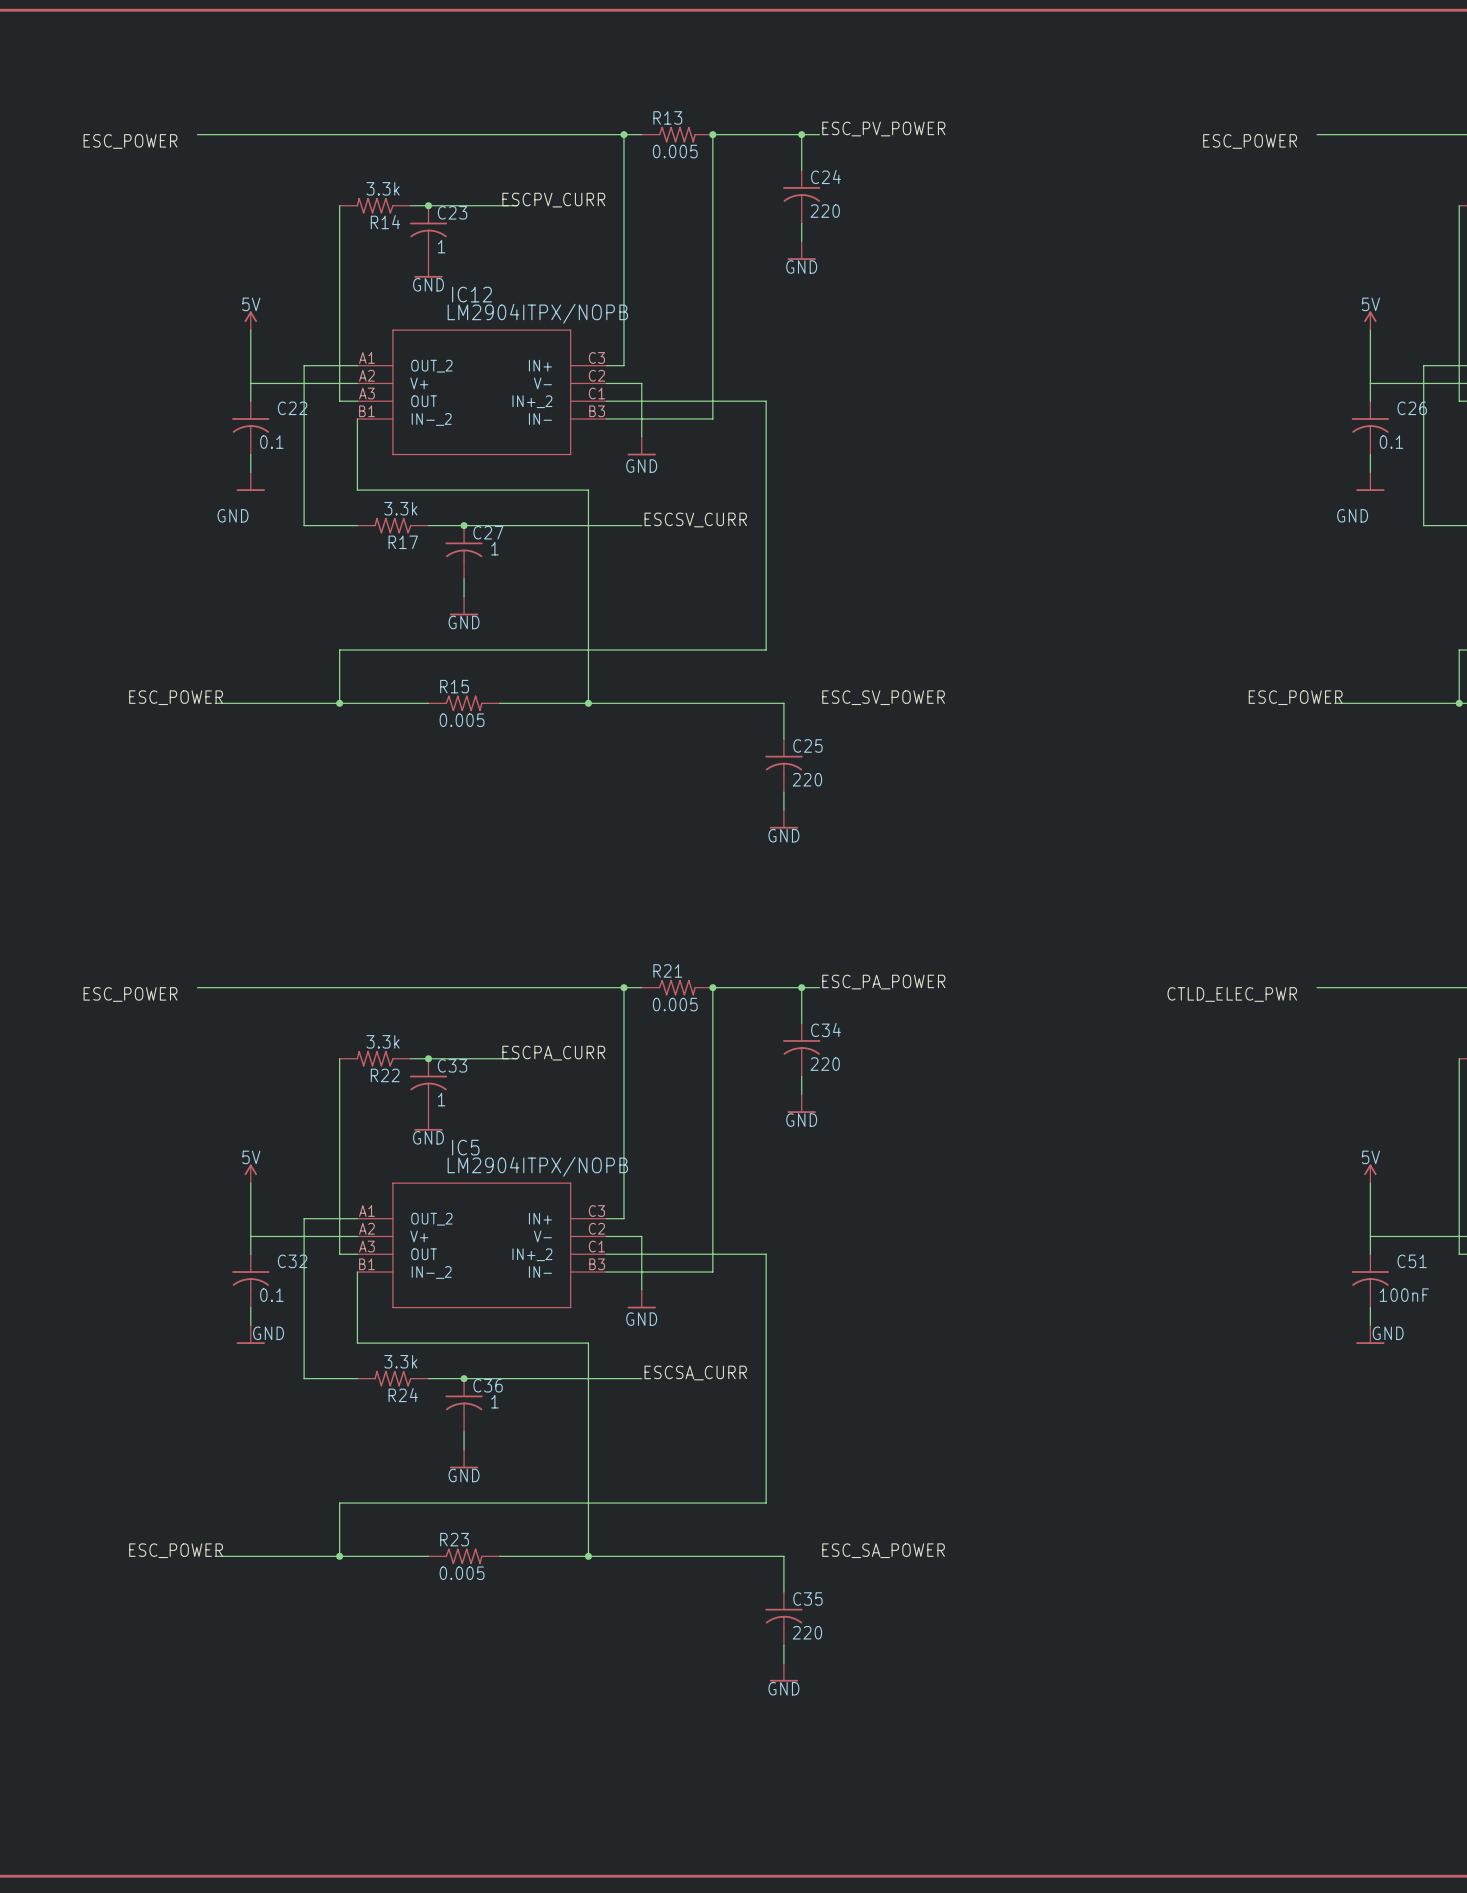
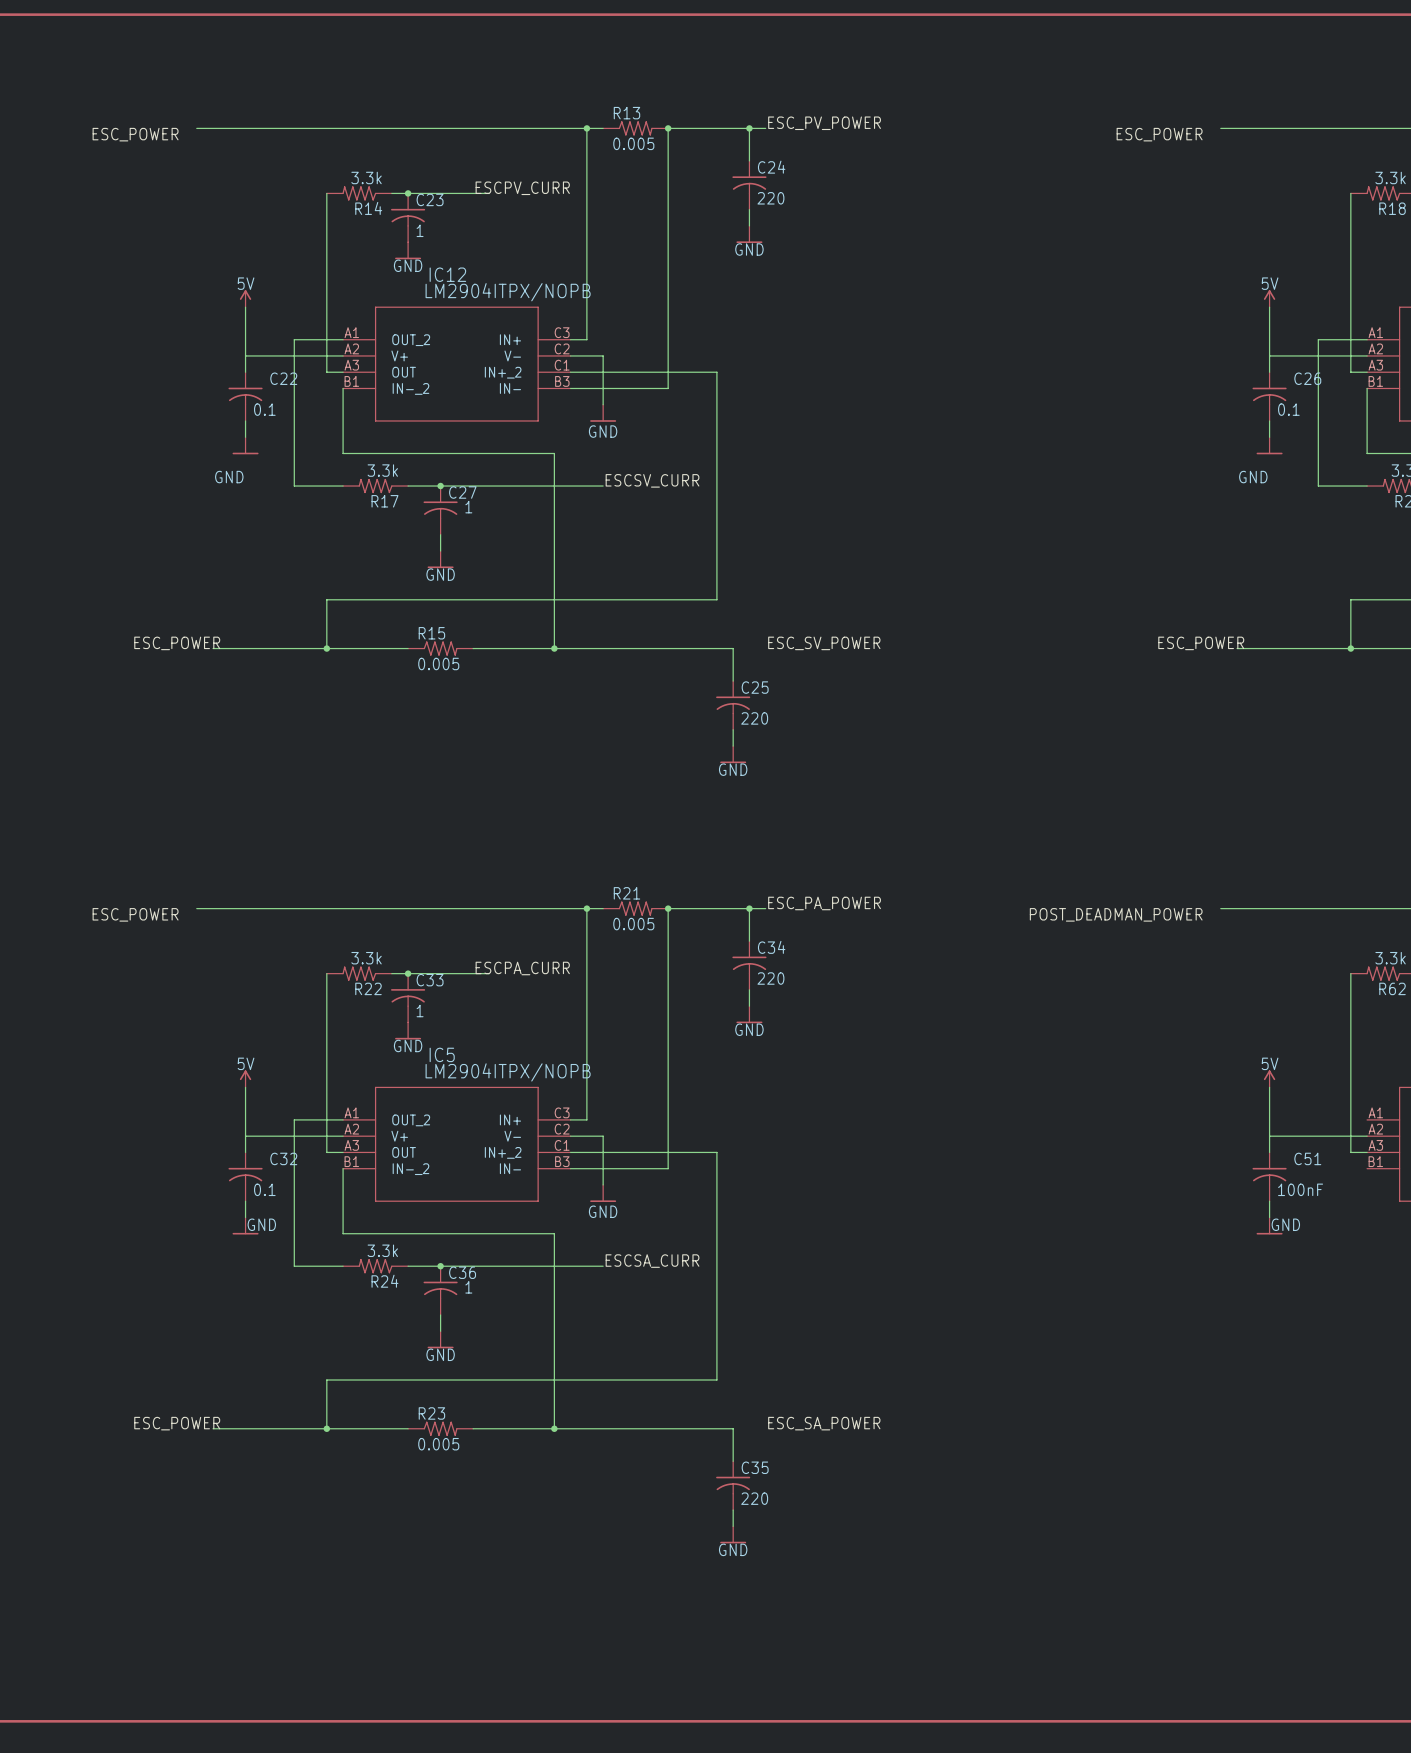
label: CTLD_ELEC_PWR (1232, 994) -> POST_DEADMAN_POWER (1116, 914)

